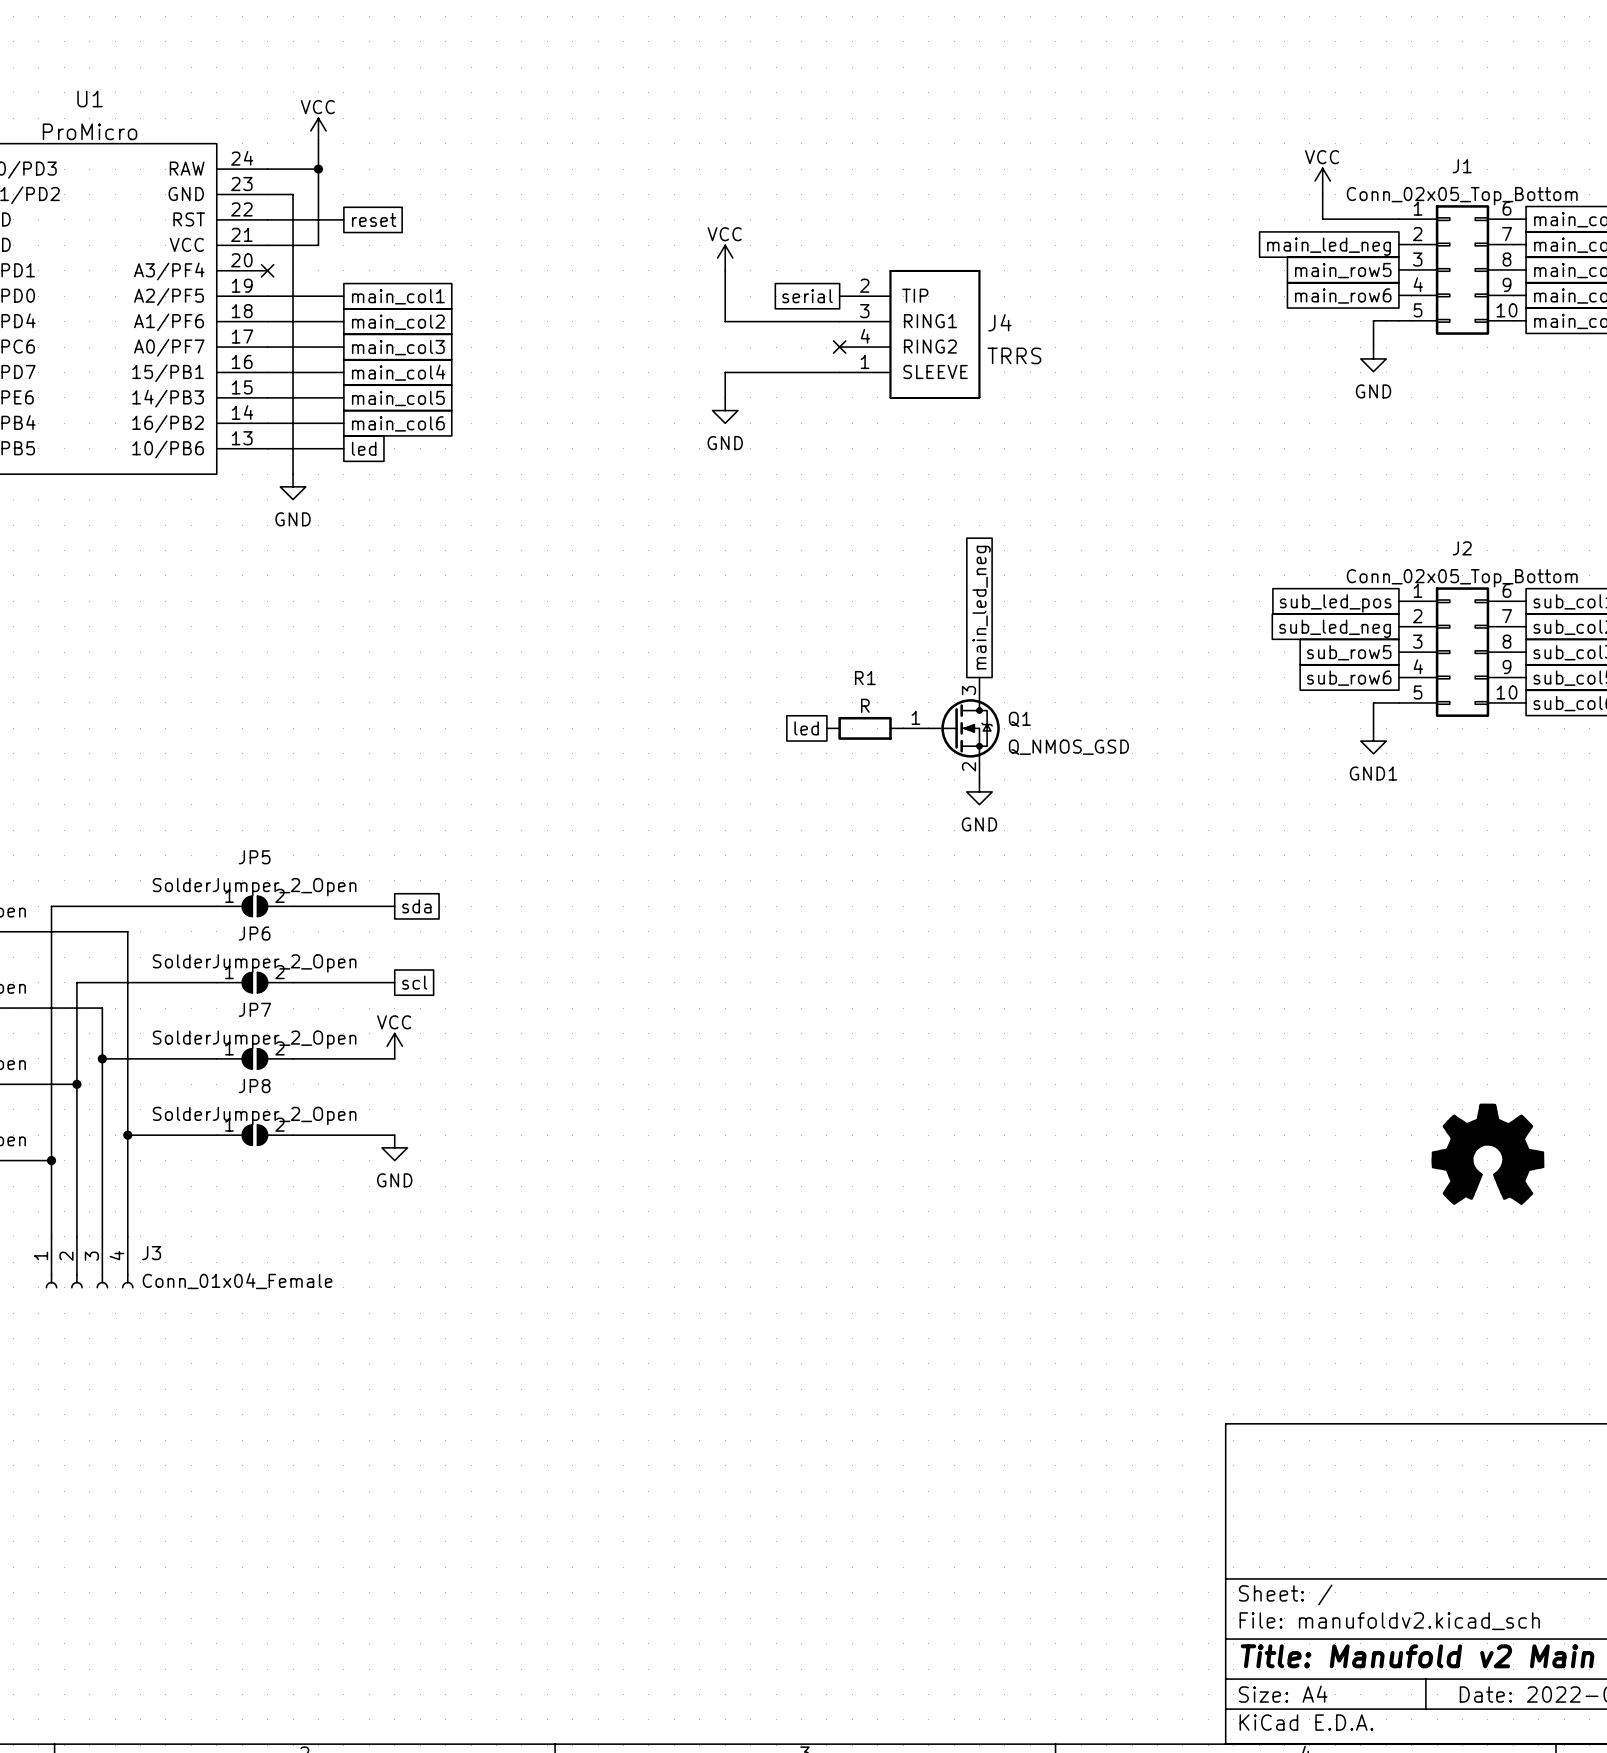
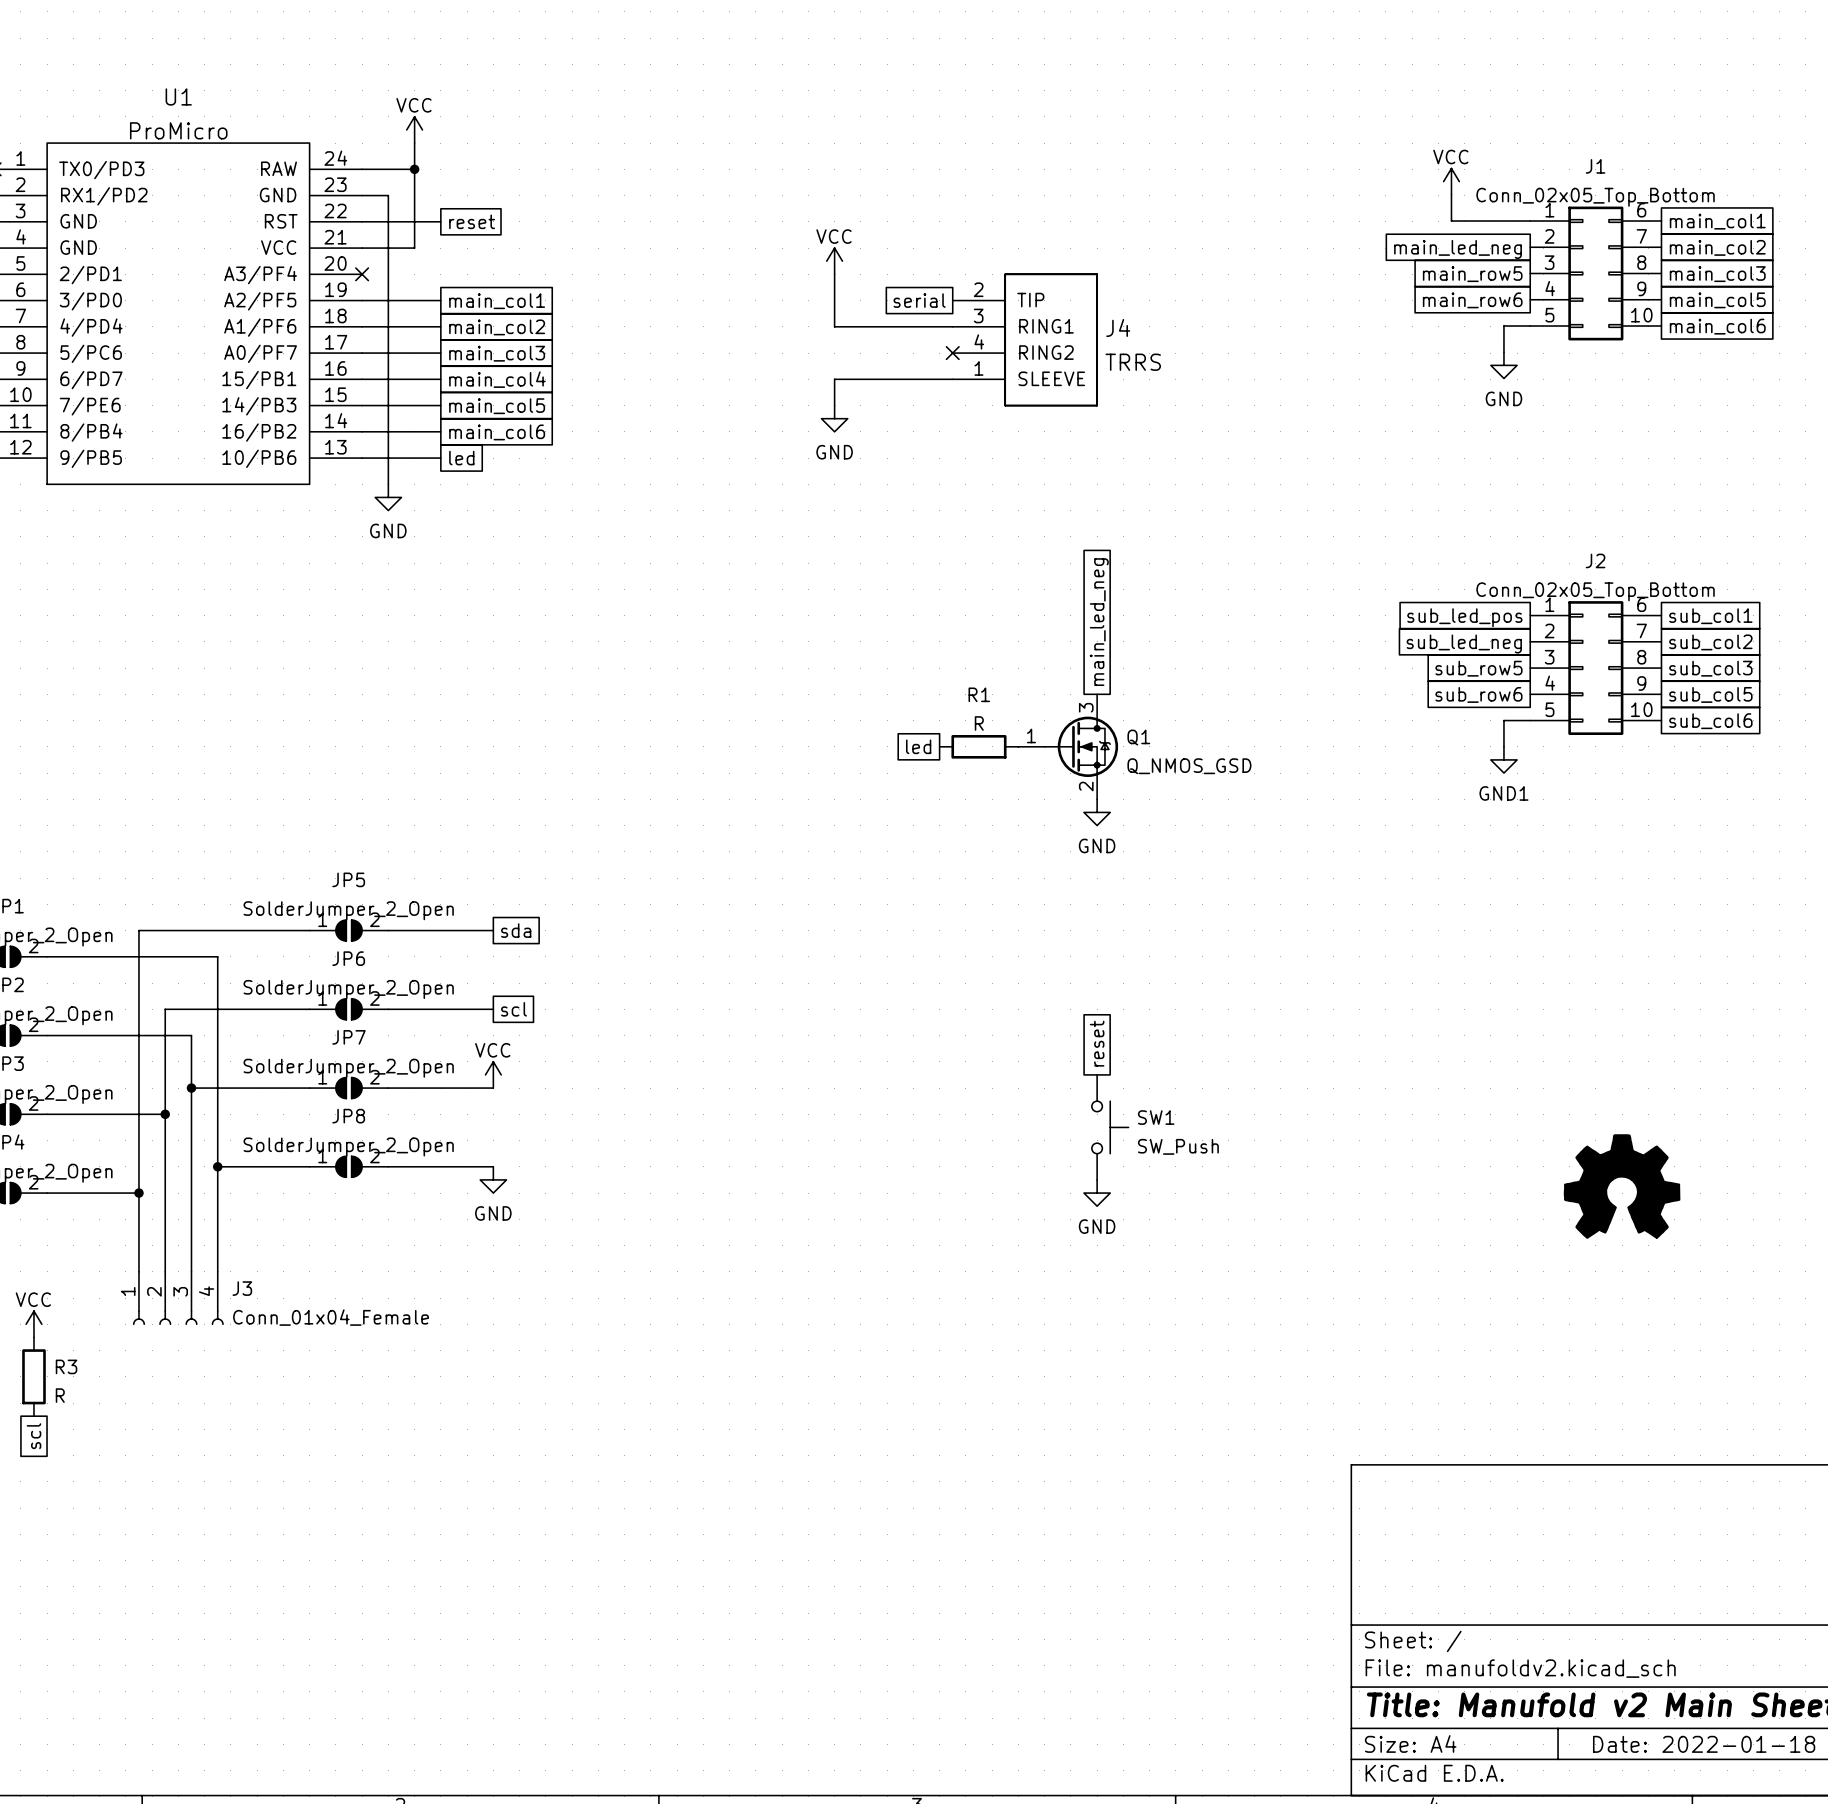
global label: none -> reset (1097, 1043)
SW1: none -> SW_Push (1110, 1127)
power symbol: none -> GND (1097, 1193)

